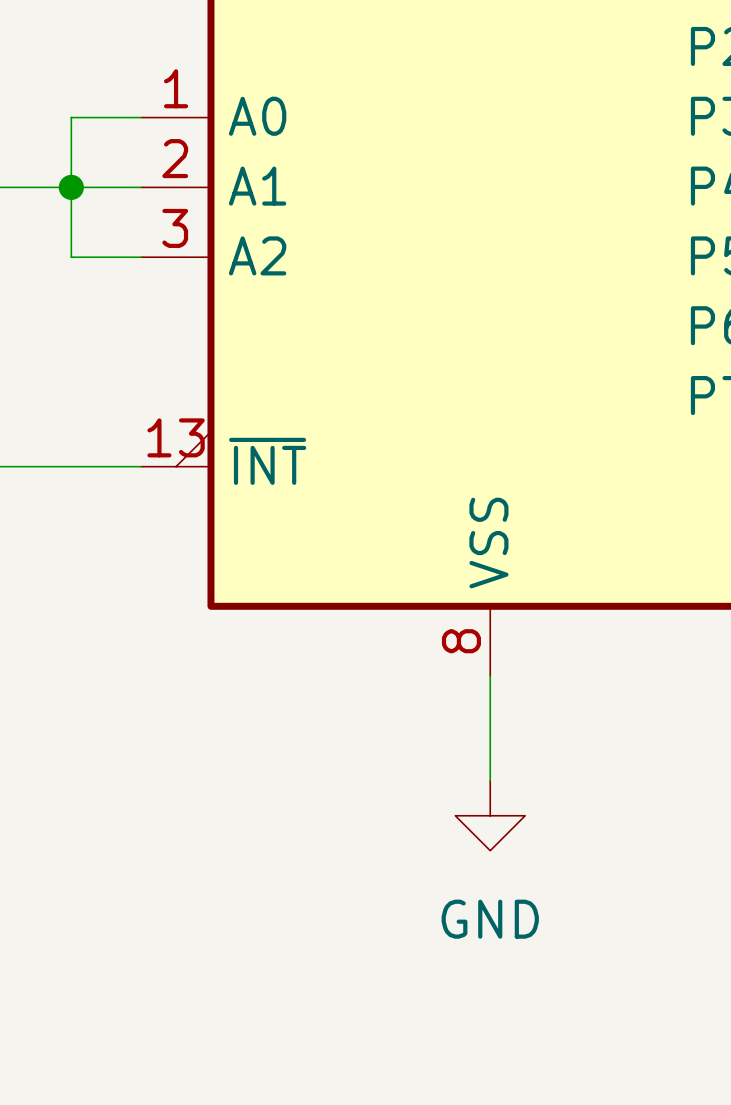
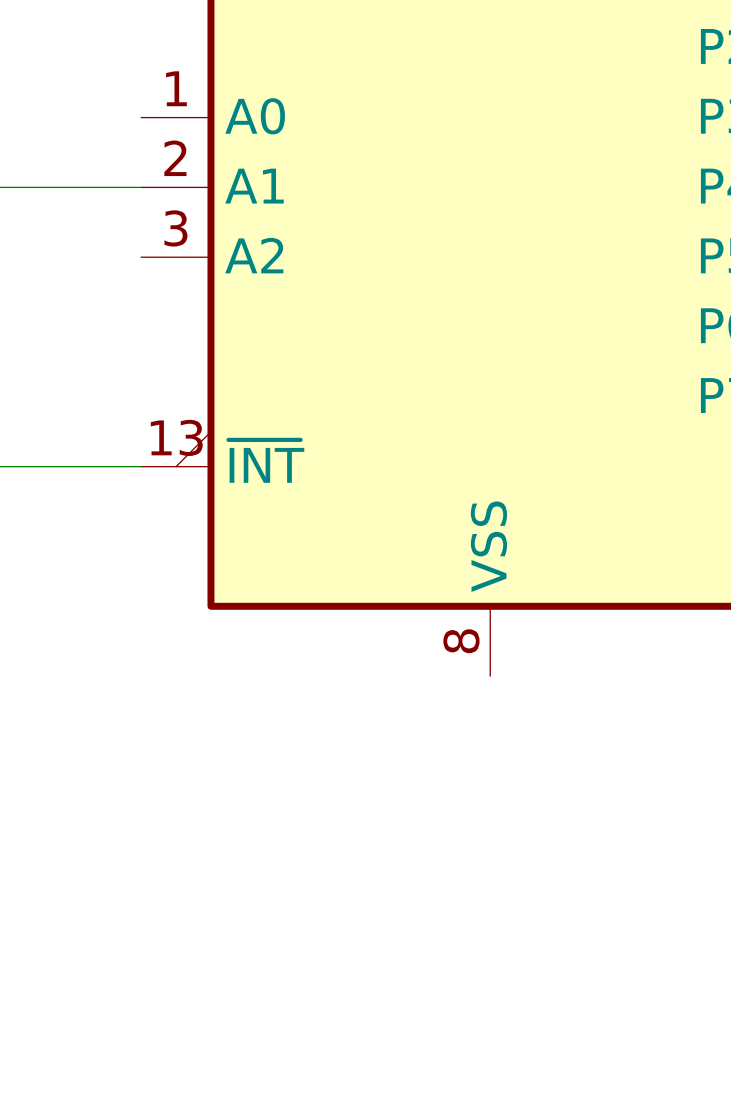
wire: (141, 117) (71, 117) (71, 257) (141, 257) -> none
junction: (71, 187) -> none
wire: (490, 676) (490, 780) -> none
power symbol: GND (490, 815) -> none

